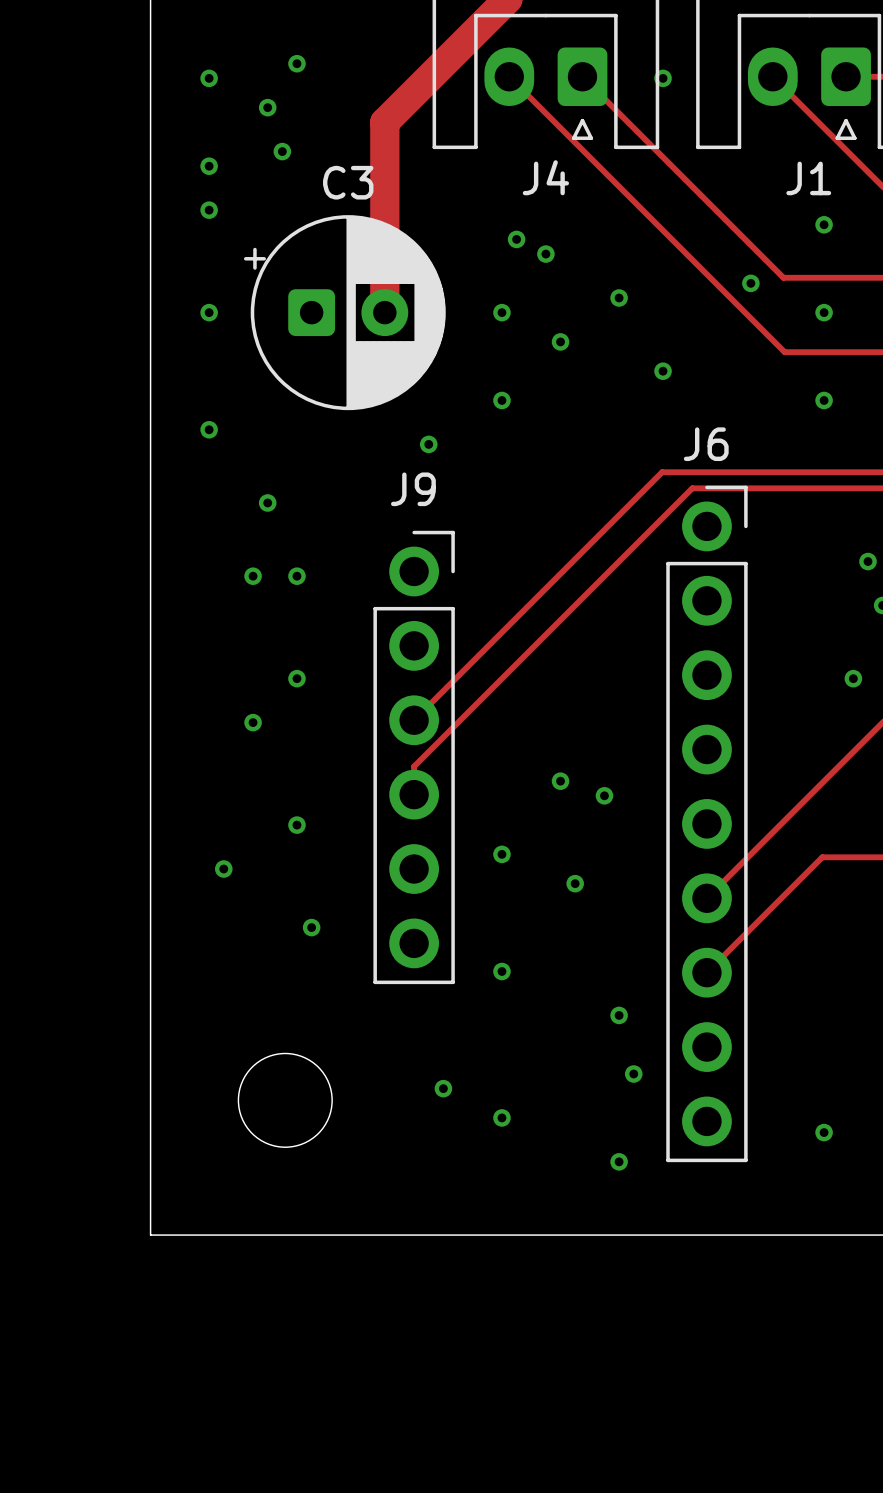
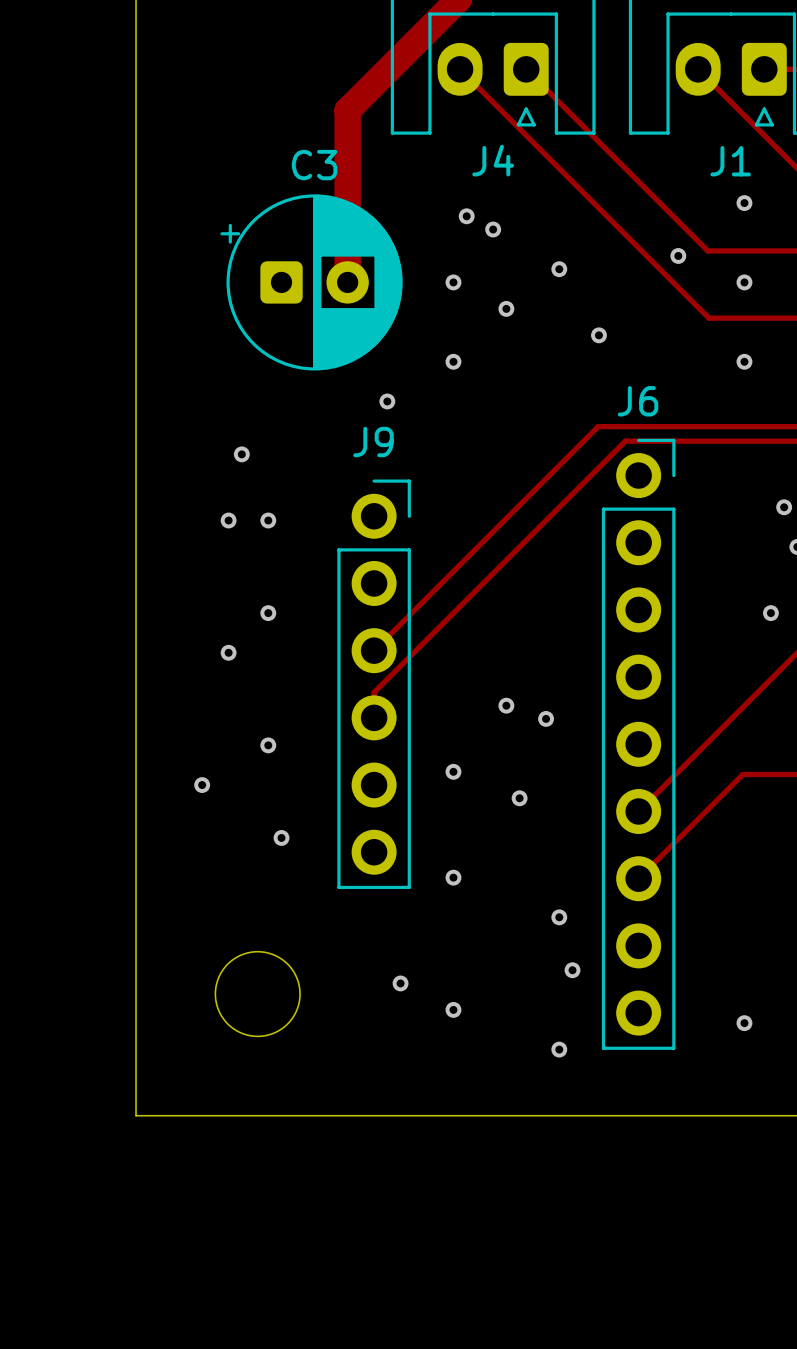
via: (296, 63) -> none
via: (209, 78) -> none
via: (663, 78) -> none
via: (267, 107) -> none
via: (282, 151) -> none
via: (209, 166) -> none
via: (209, 210) -> none
via: (209, 312) -> none
via: (209, 429) -> none

